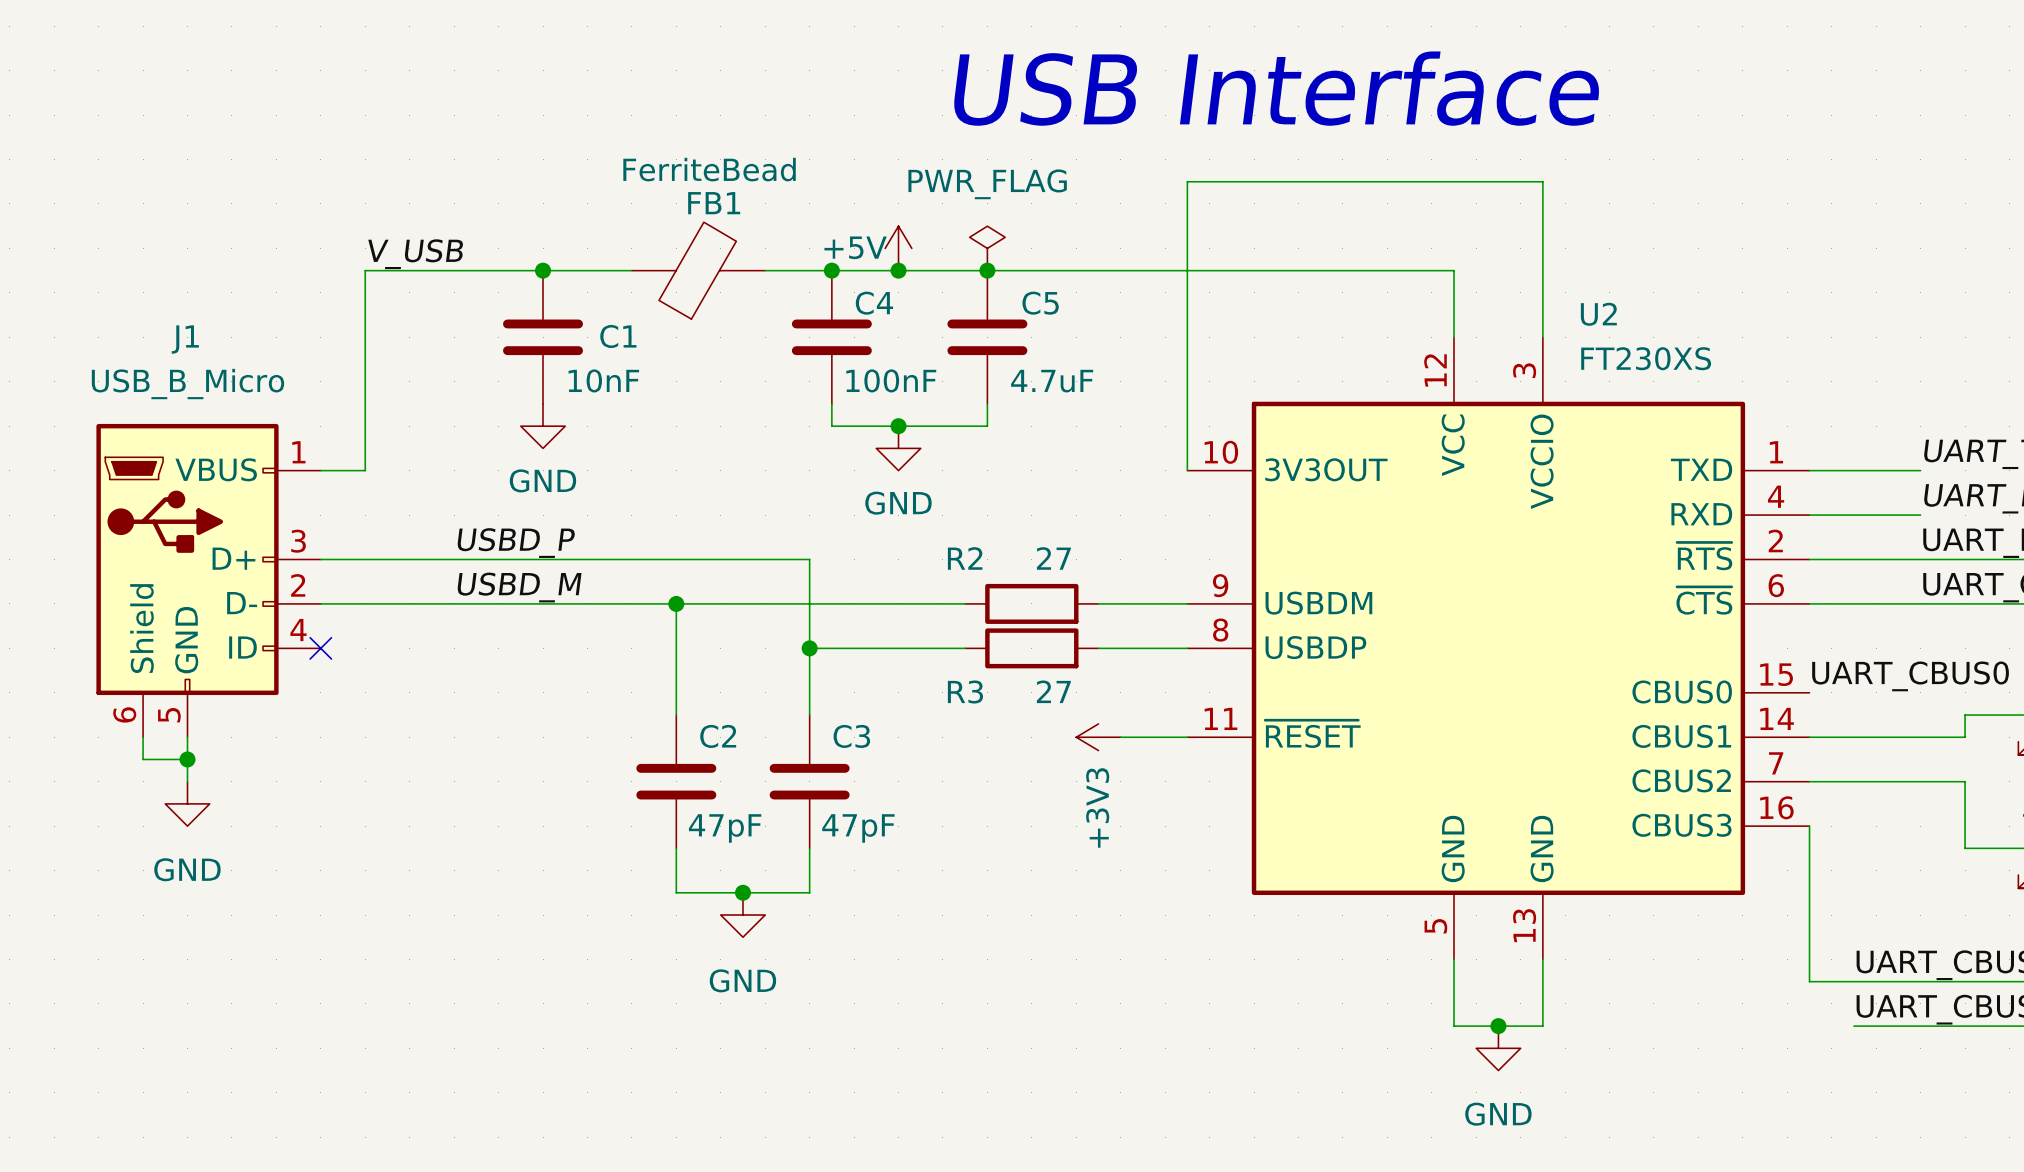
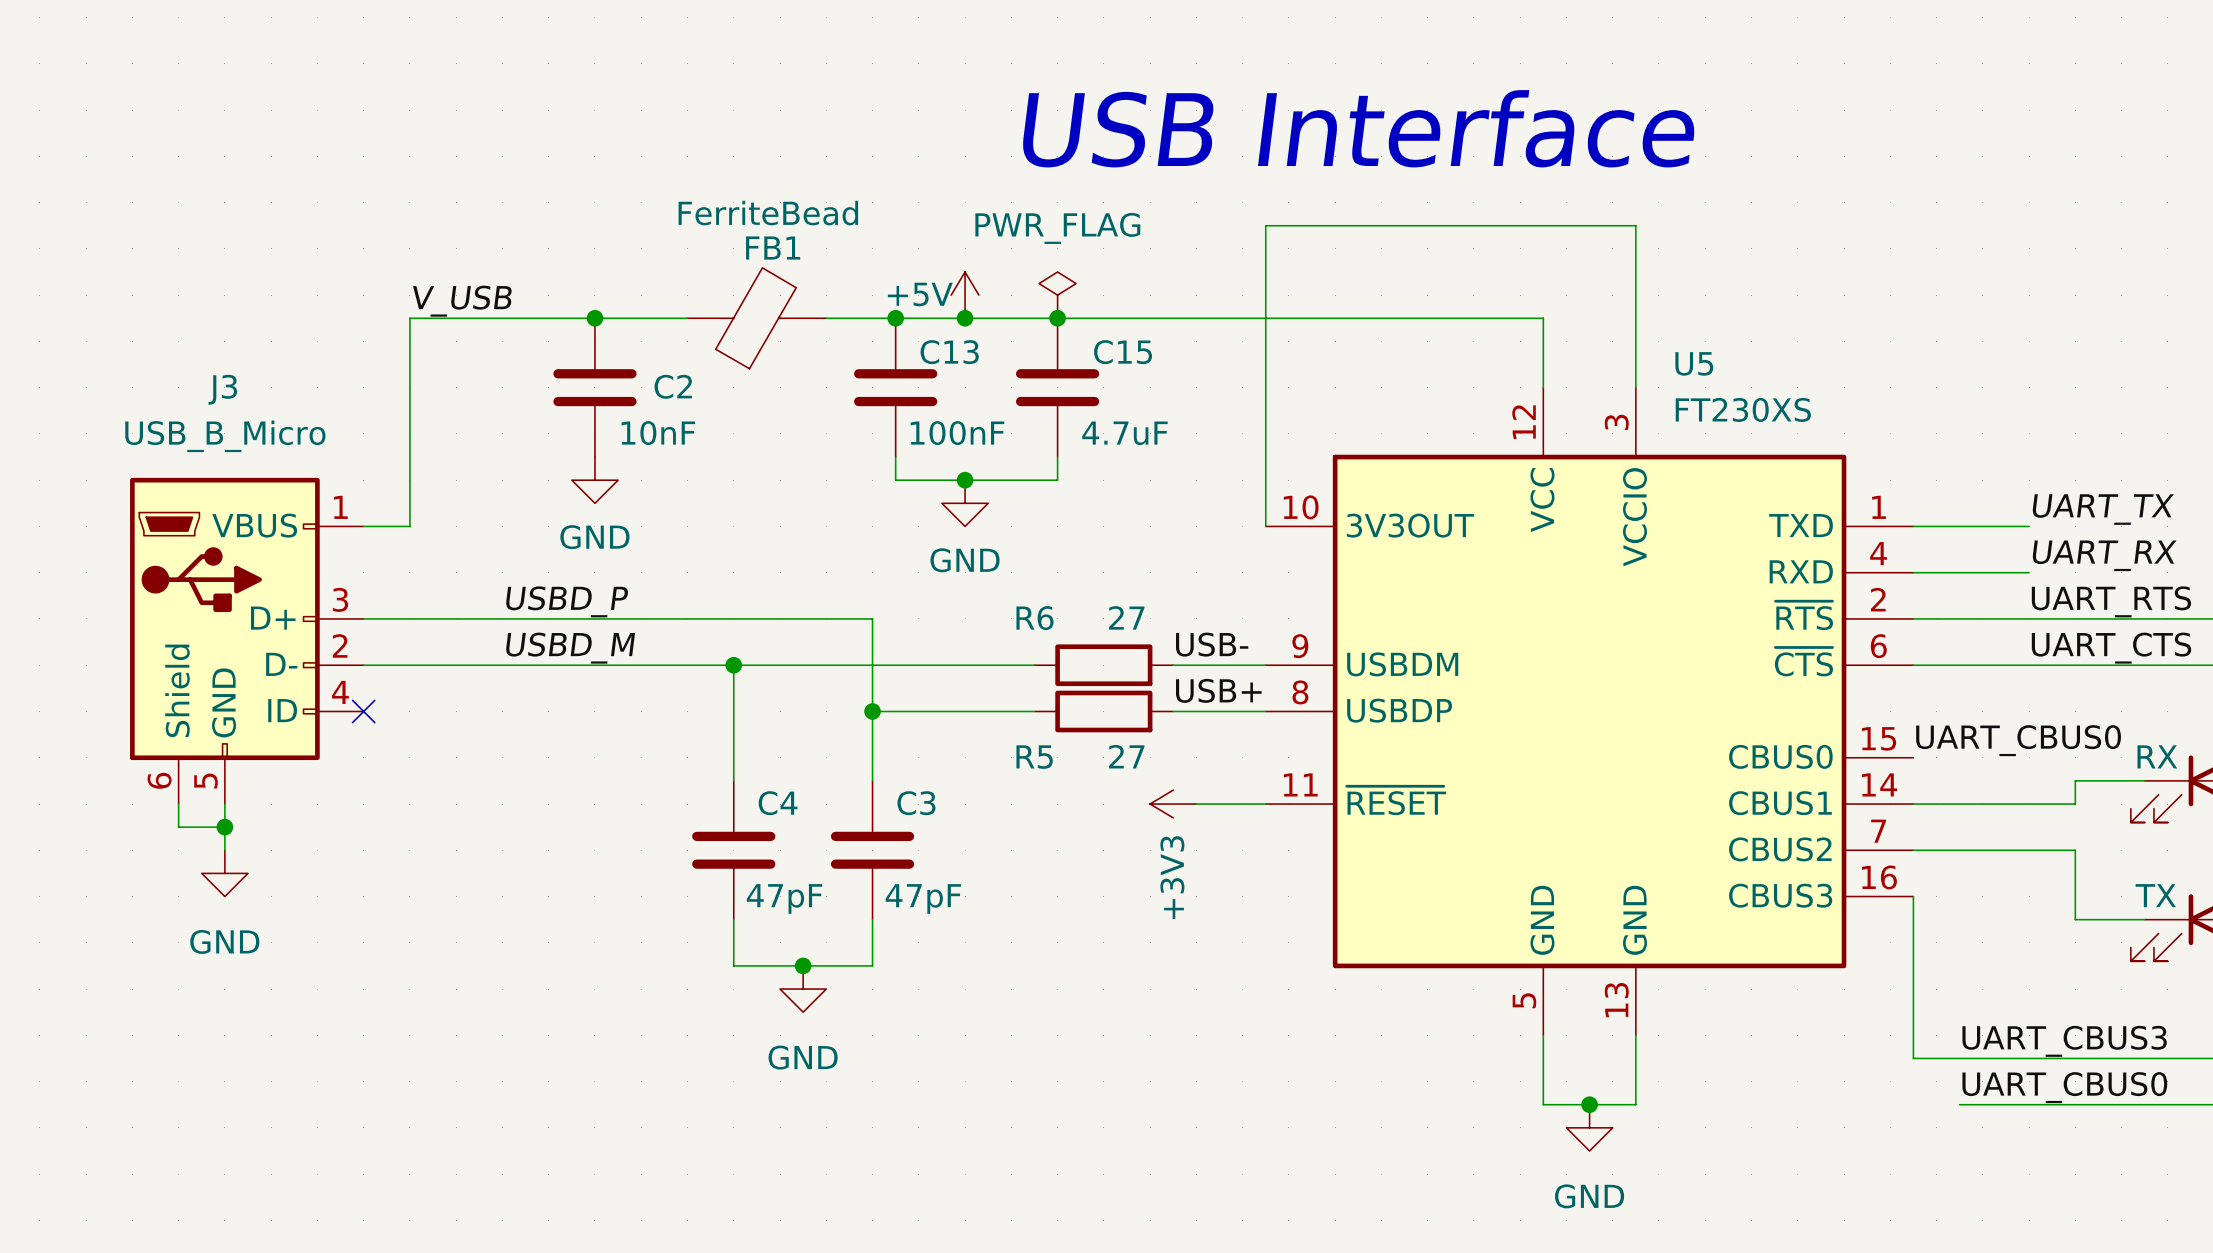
C4 name: C4 (874, 303) -> C13 (949, 352)
C5 name: C5 (1040, 303) -> C15 (1123, 352)
U2 name: U2 (1598, 314) -> U5 (1694, 363)
C1 name: C1 (618, 336) -> C2 (673, 386)
J1 name: J1 (185, 339) -> J3 (222, 389)
R2 name: R2 (965, 558) -> R6 (1035, 618)
label: none -> USB- (1212, 644)
label: none -> USB+ (1218, 690)
R3 name: R3 (965, 692) -> R5 (1034, 757)
C2 name: C2 (718, 736) -> C4 (778, 803)

